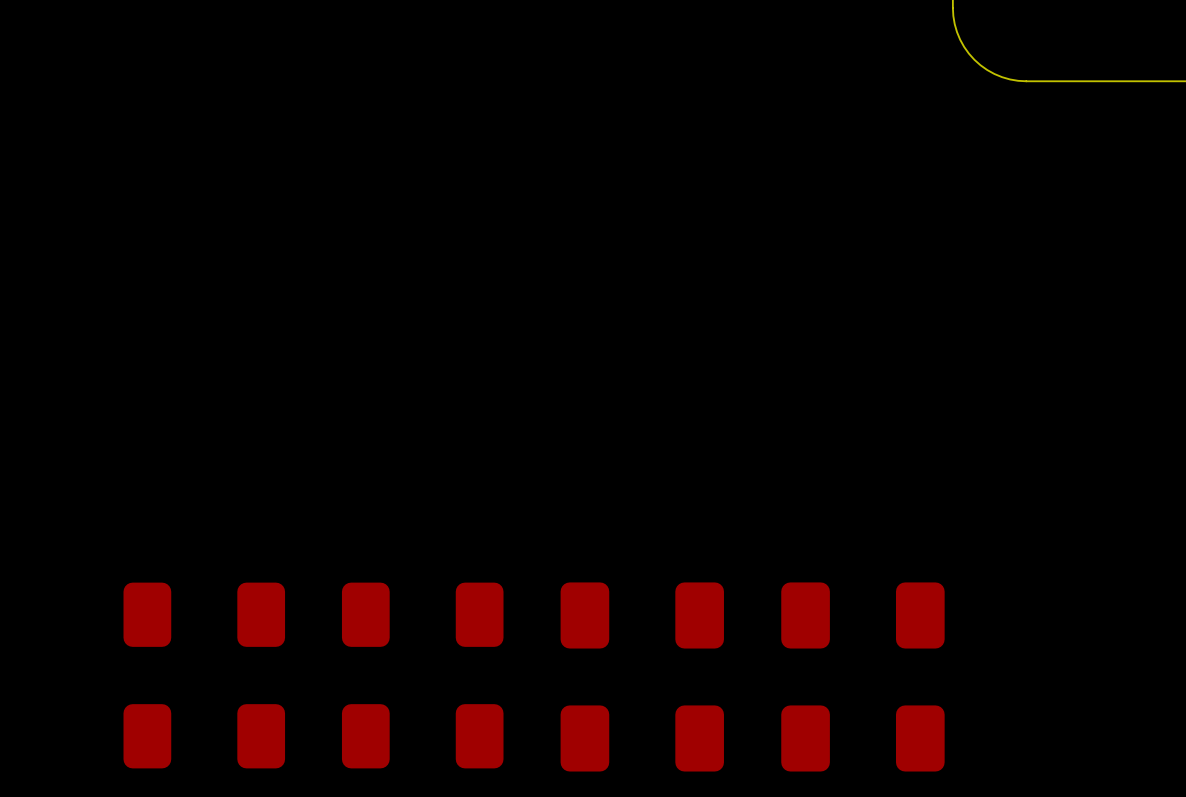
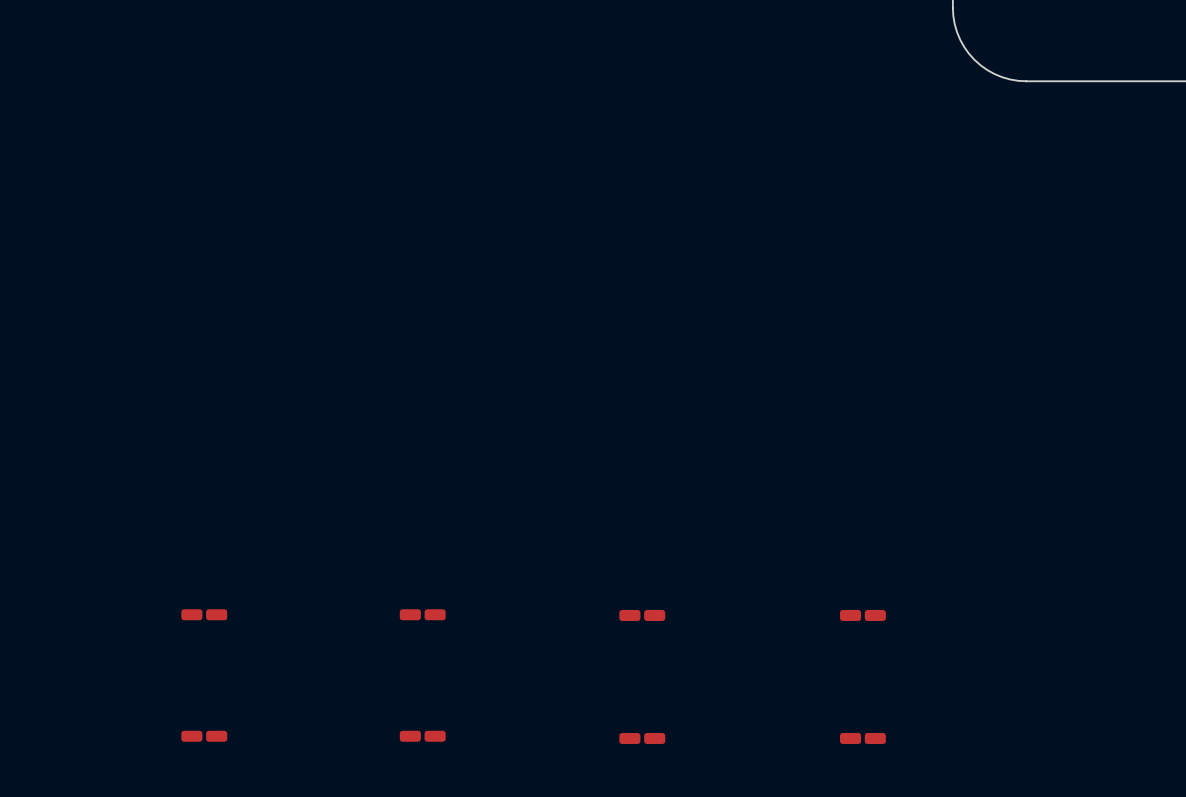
part footprint: [123, 582, 286, 647] -> [181, 609, 228, 621]
part footprint: [341, 582, 504, 647] -> [399, 609, 446, 621]
part footprint: [560, 582, 724, 649] -> [619, 609, 666, 621]
part footprint: [781, 582, 945, 649] -> [839, 609, 886, 621]
part footprint: [123, 704, 286, 769] -> [181, 730, 228, 742]
part footprint: [341, 704, 504, 769] -> [399, 730, 446, 742]
part footprint: [560, 705, 724, 772] -> [619, 732, 666, 744]
part footprint: [781, 705, 945, 772] -> [839, 732, 886, 744]

